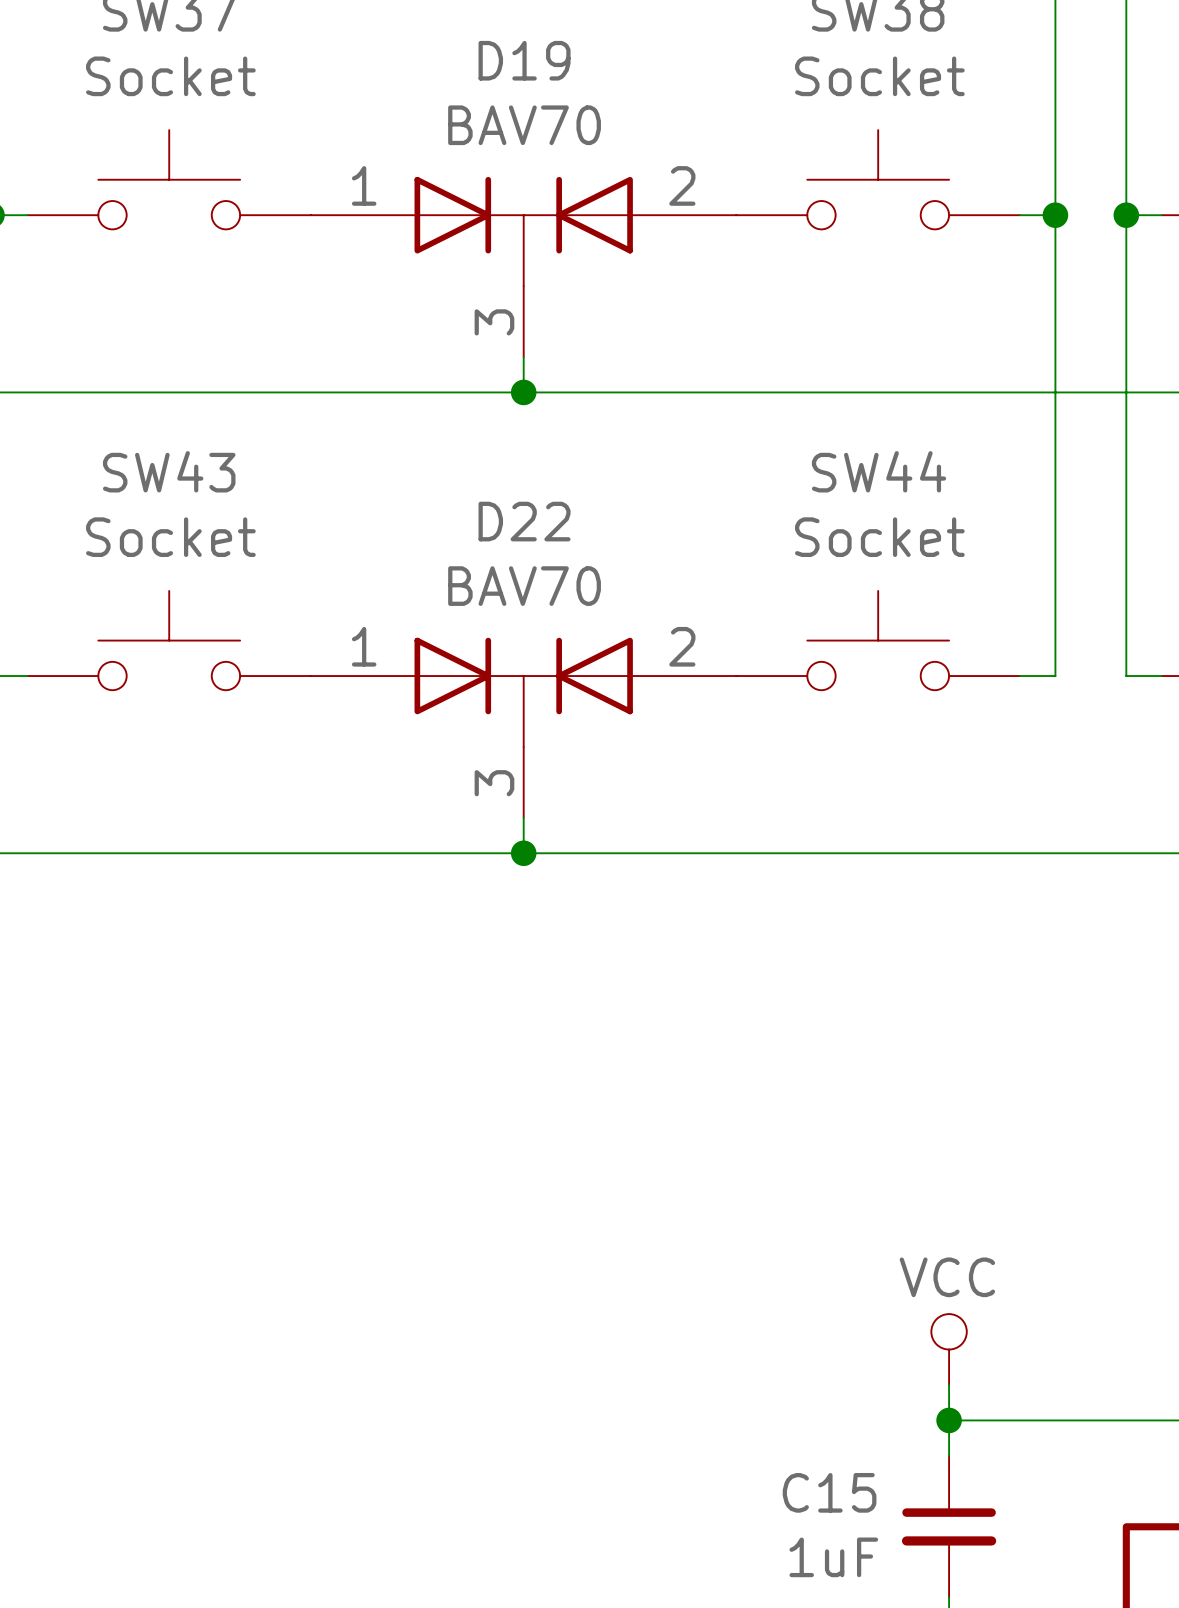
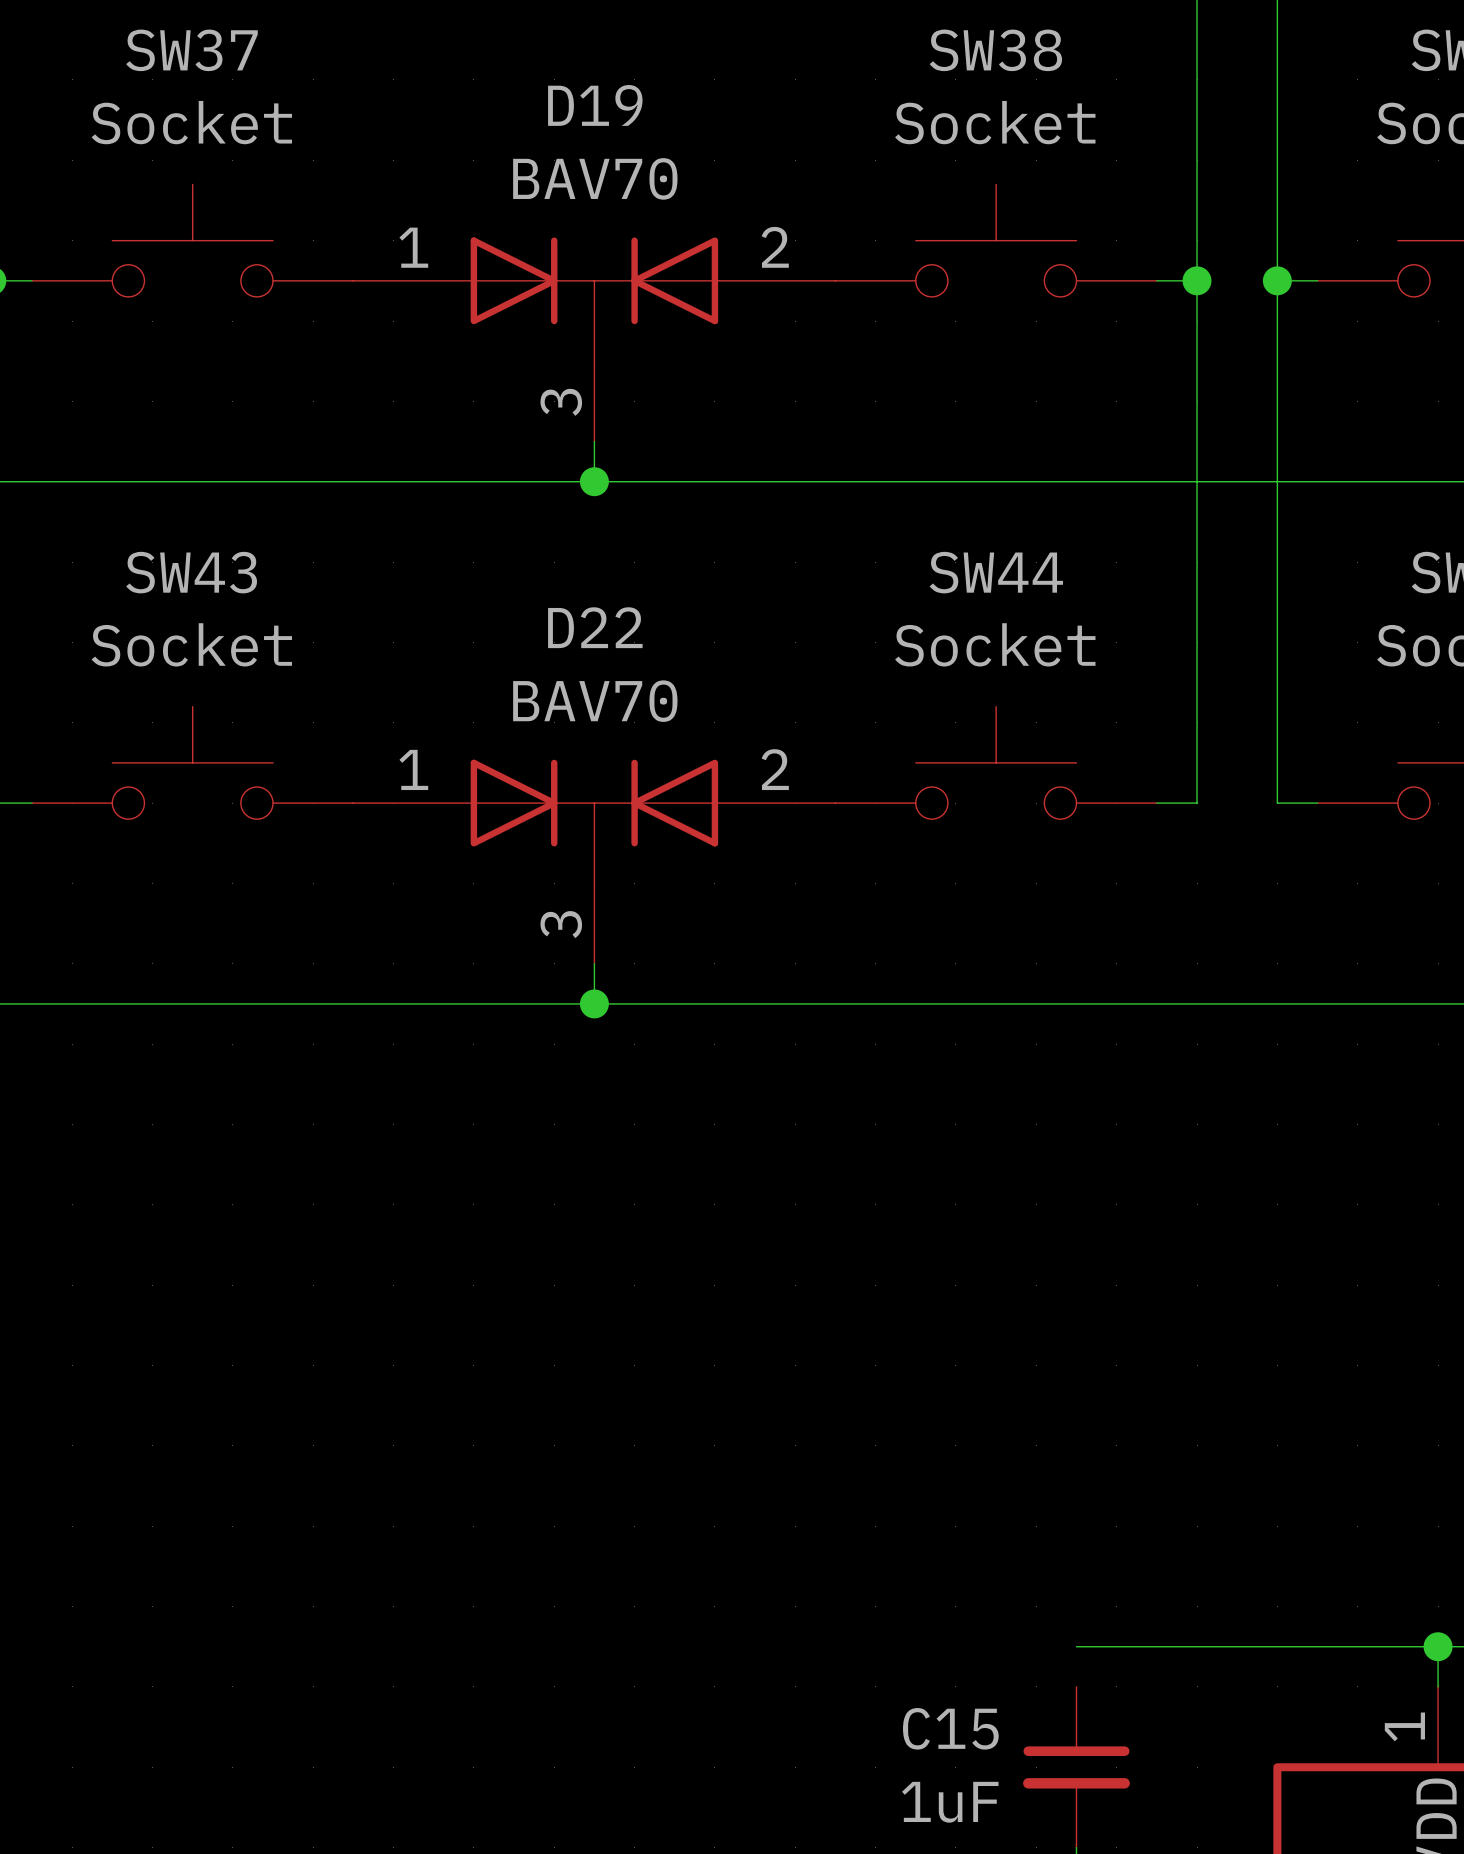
power symbol: VCC (949, 1349) -> none
wire: (949, 1384) (949, 1455) -> none
junction: (949, 1420) -> none

